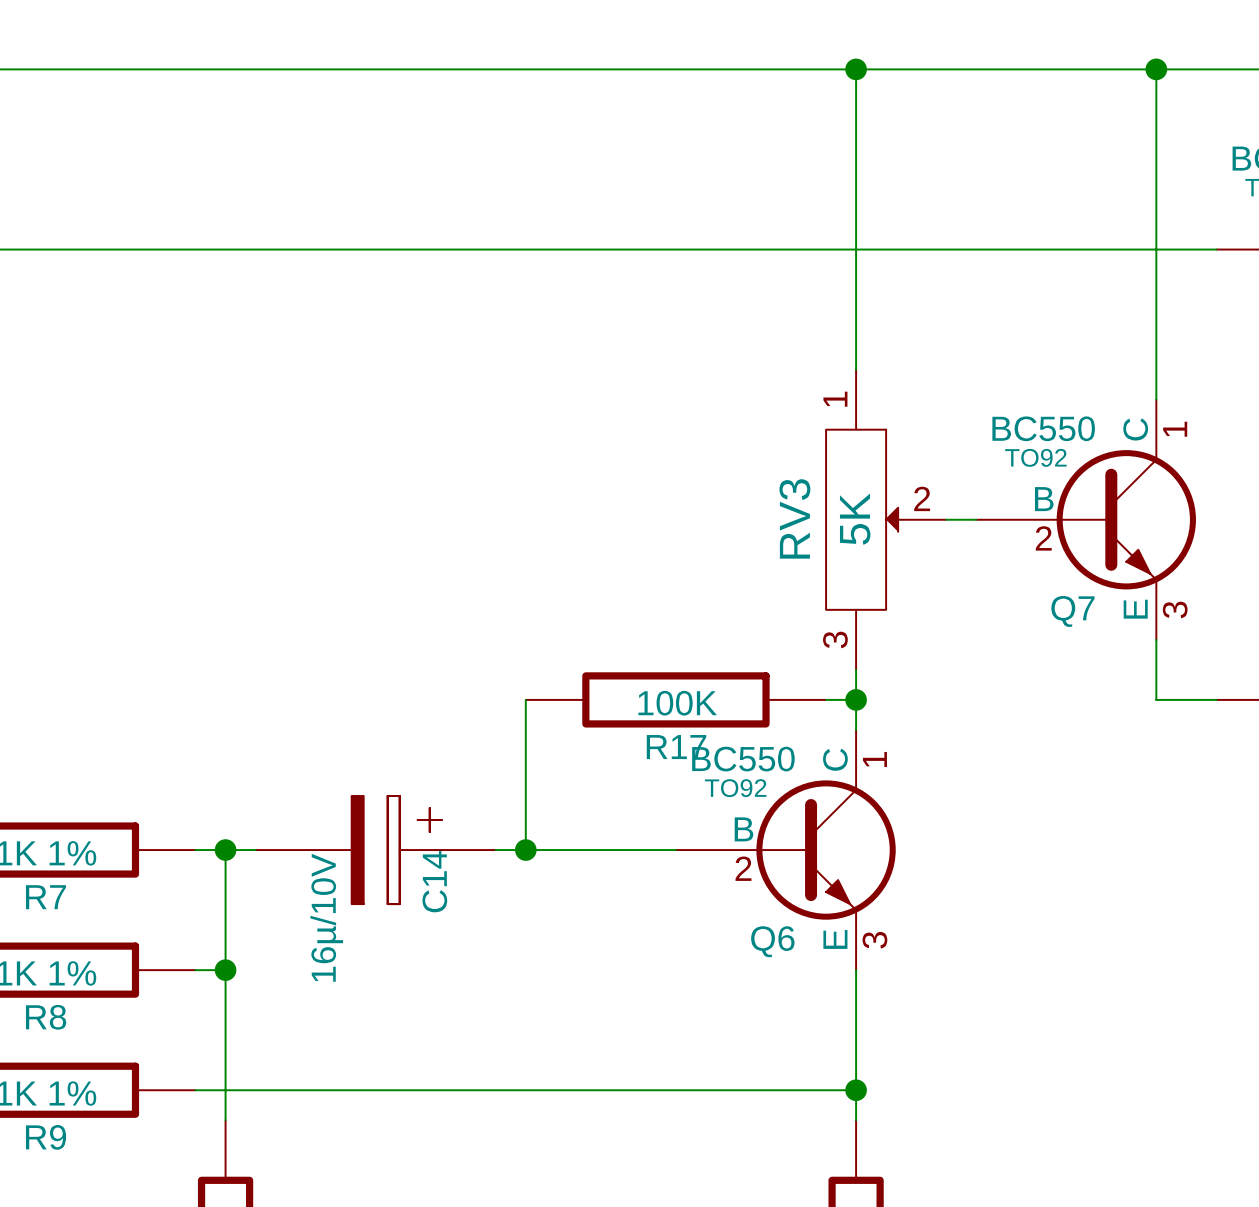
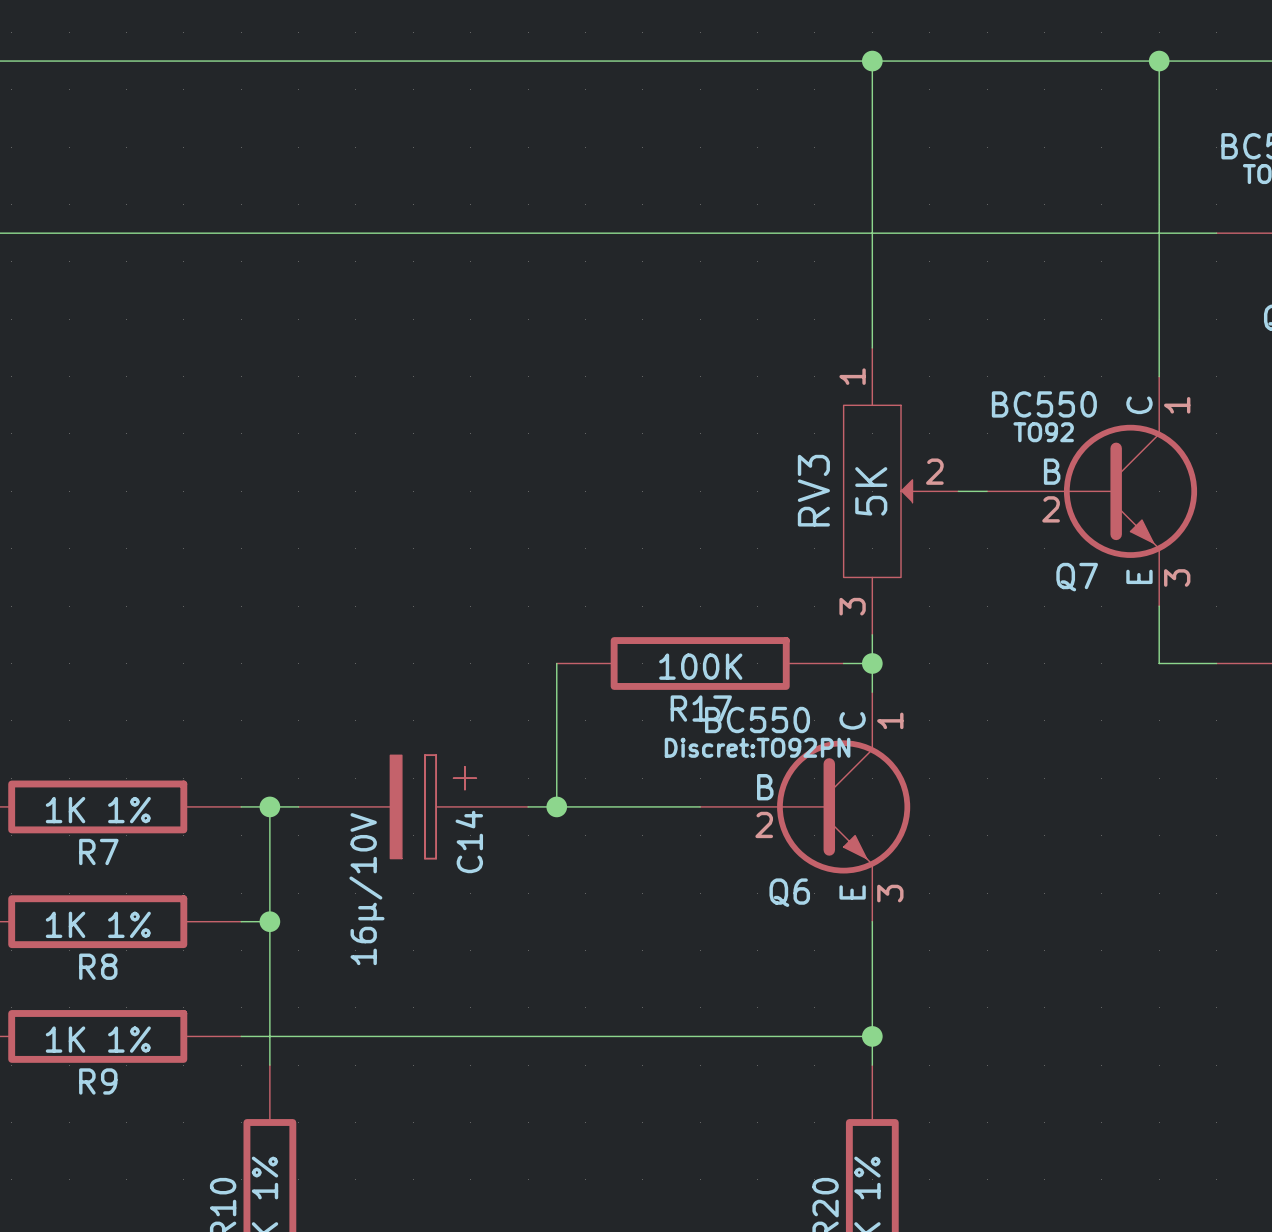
Q6 text: TO92 (735, 788) -> Discret:TO92PN (757, 747)

